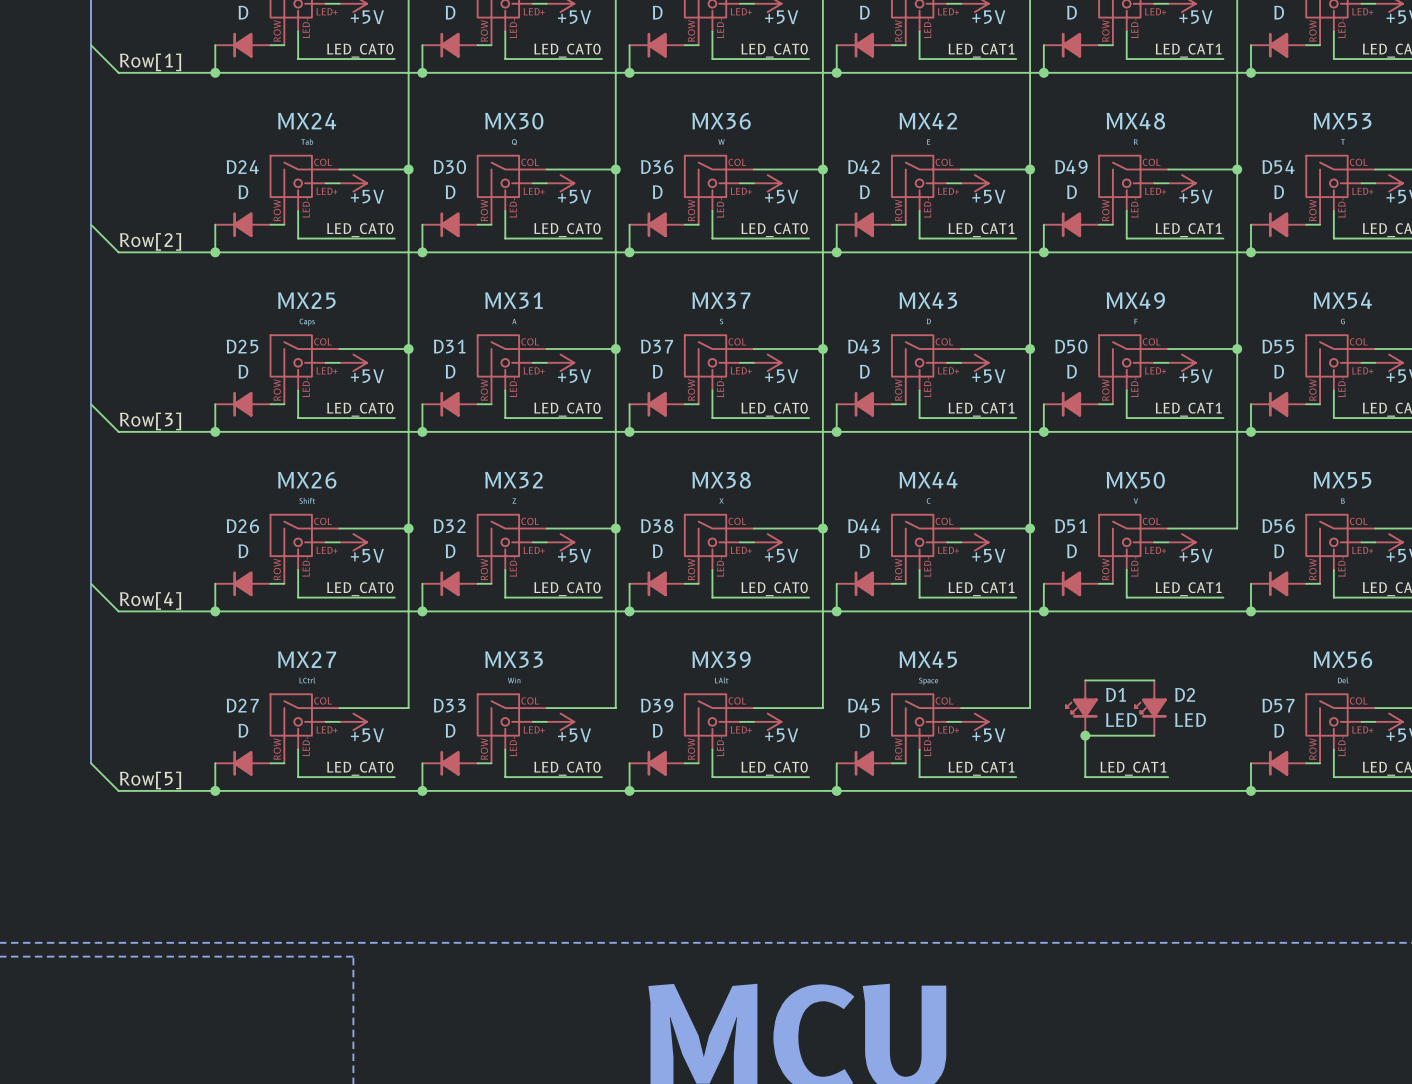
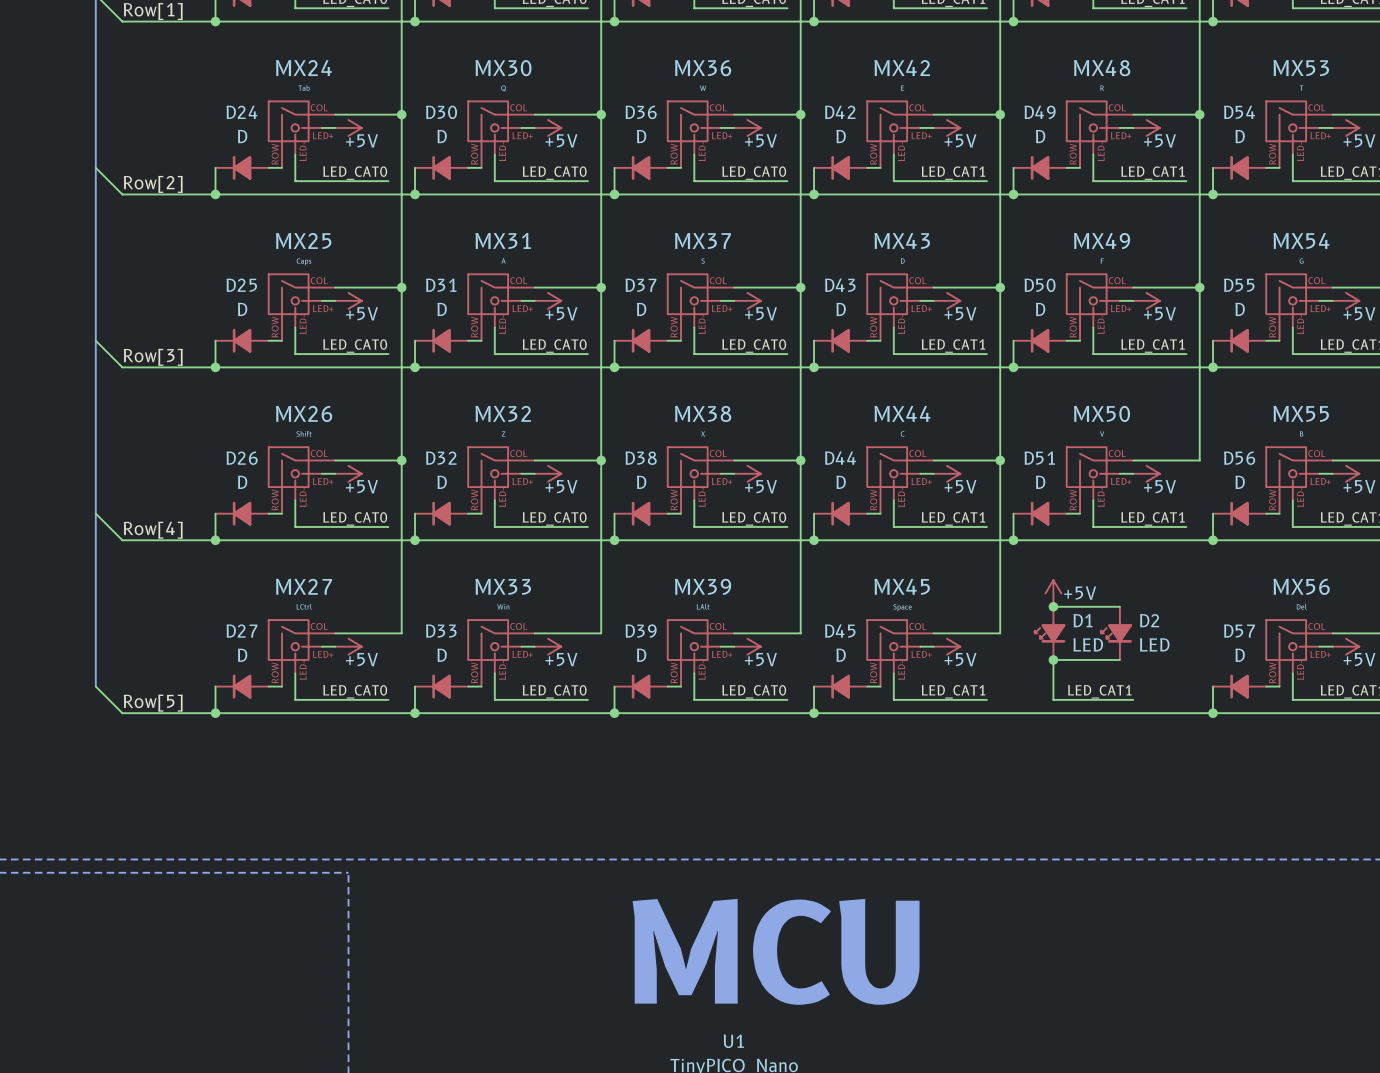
power symbol: none -> +5V (1053, 593)
junction: none -> (1053, 606)

